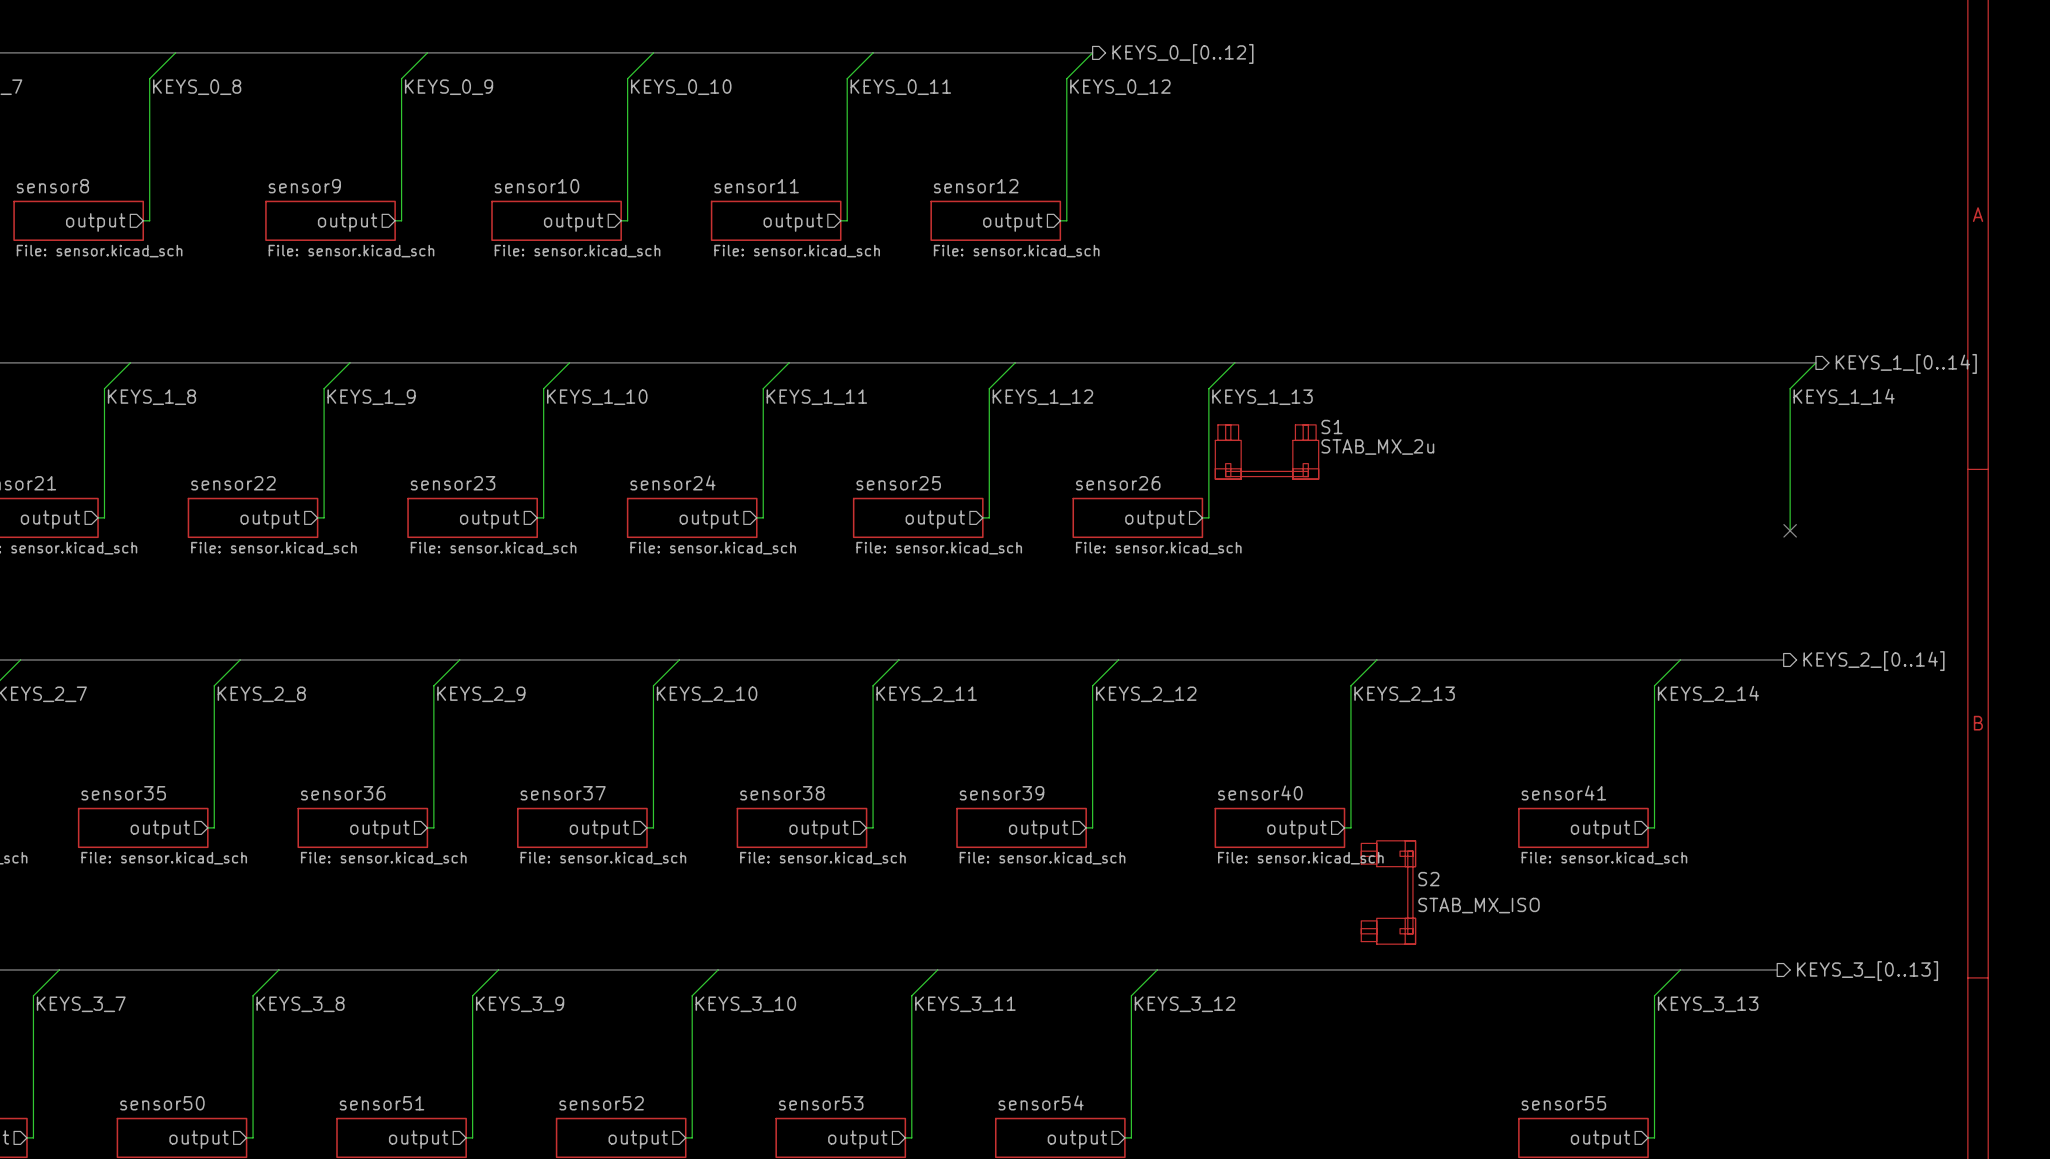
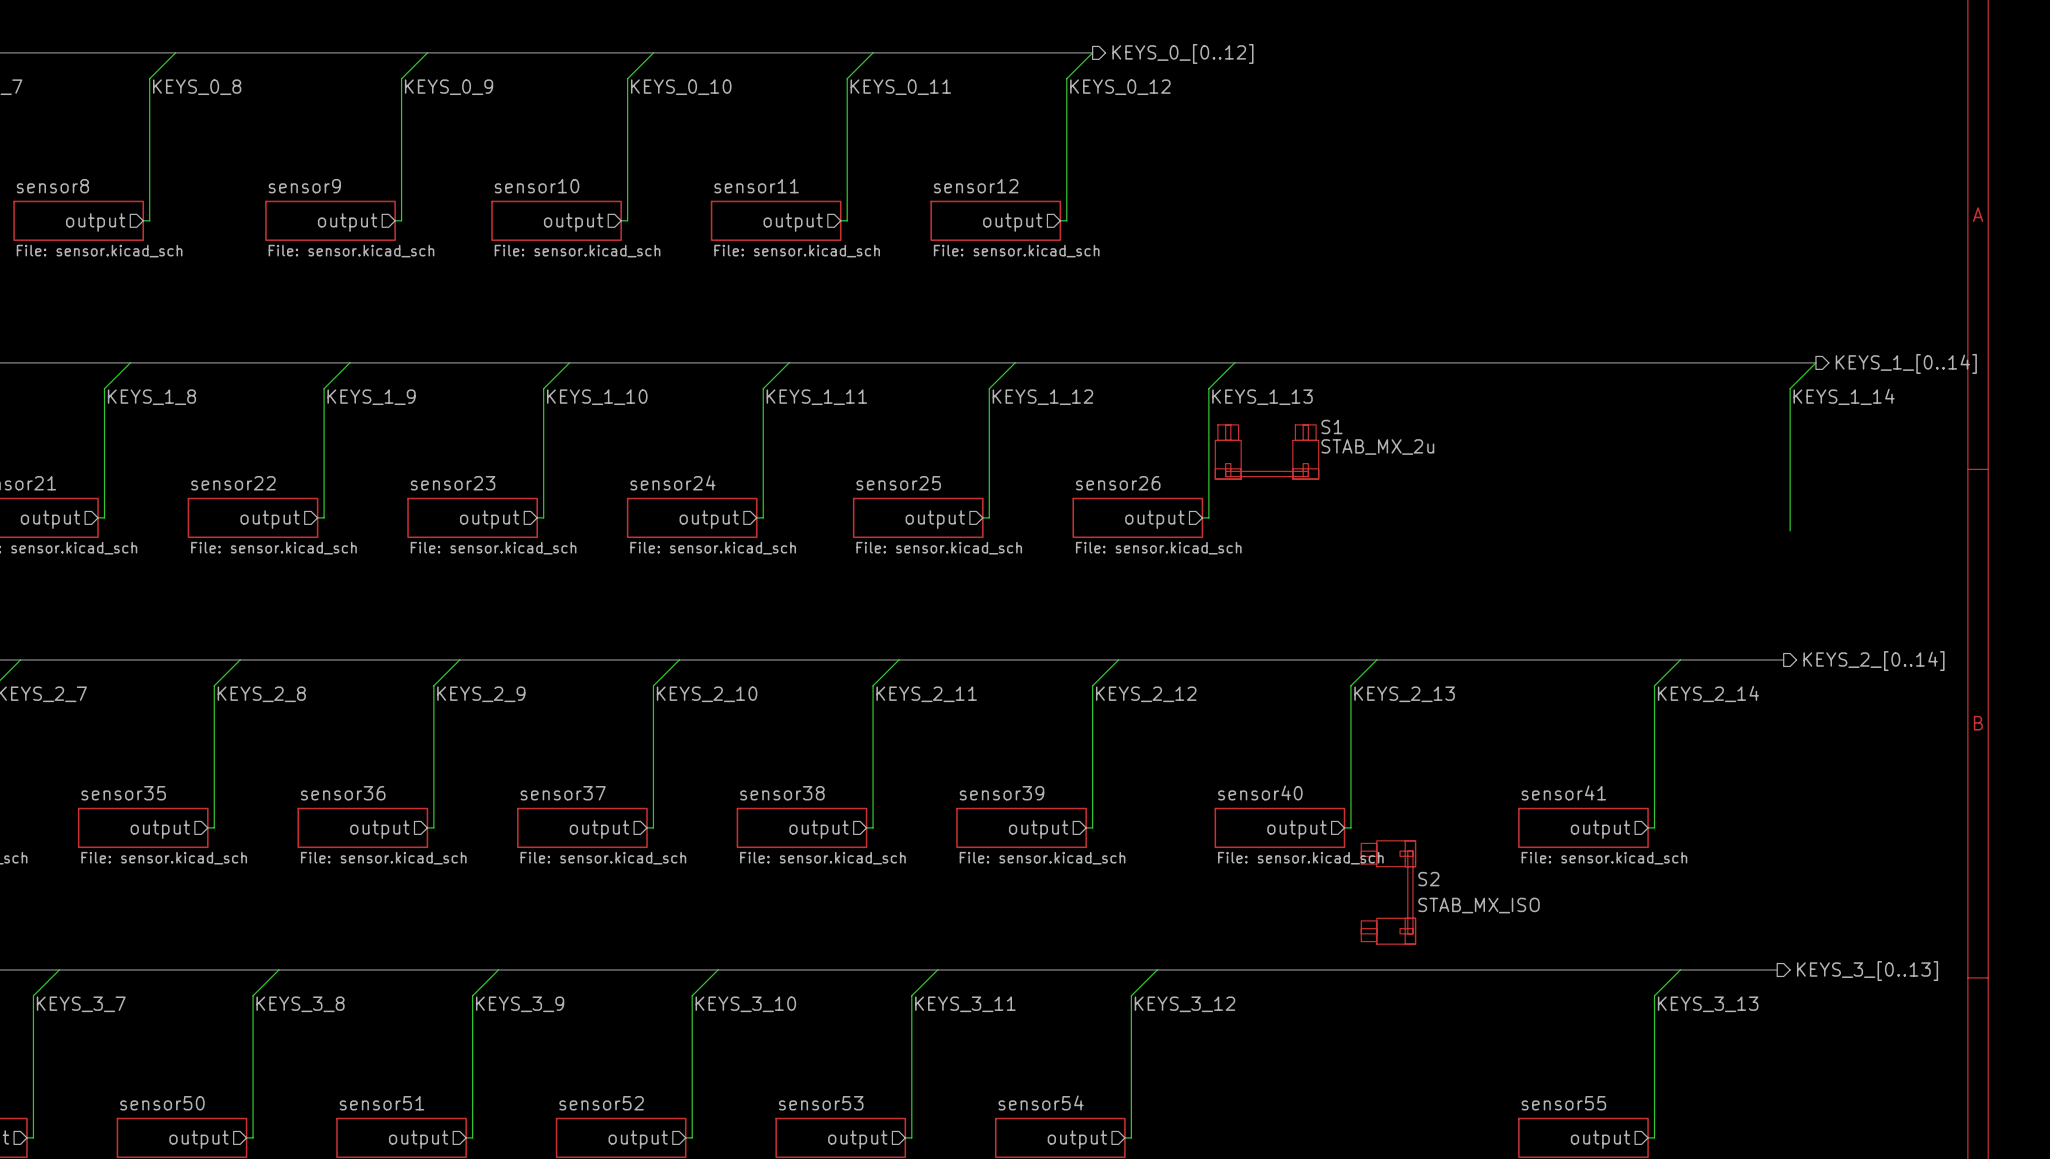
no-connect mark: (1790, 530) -> none

